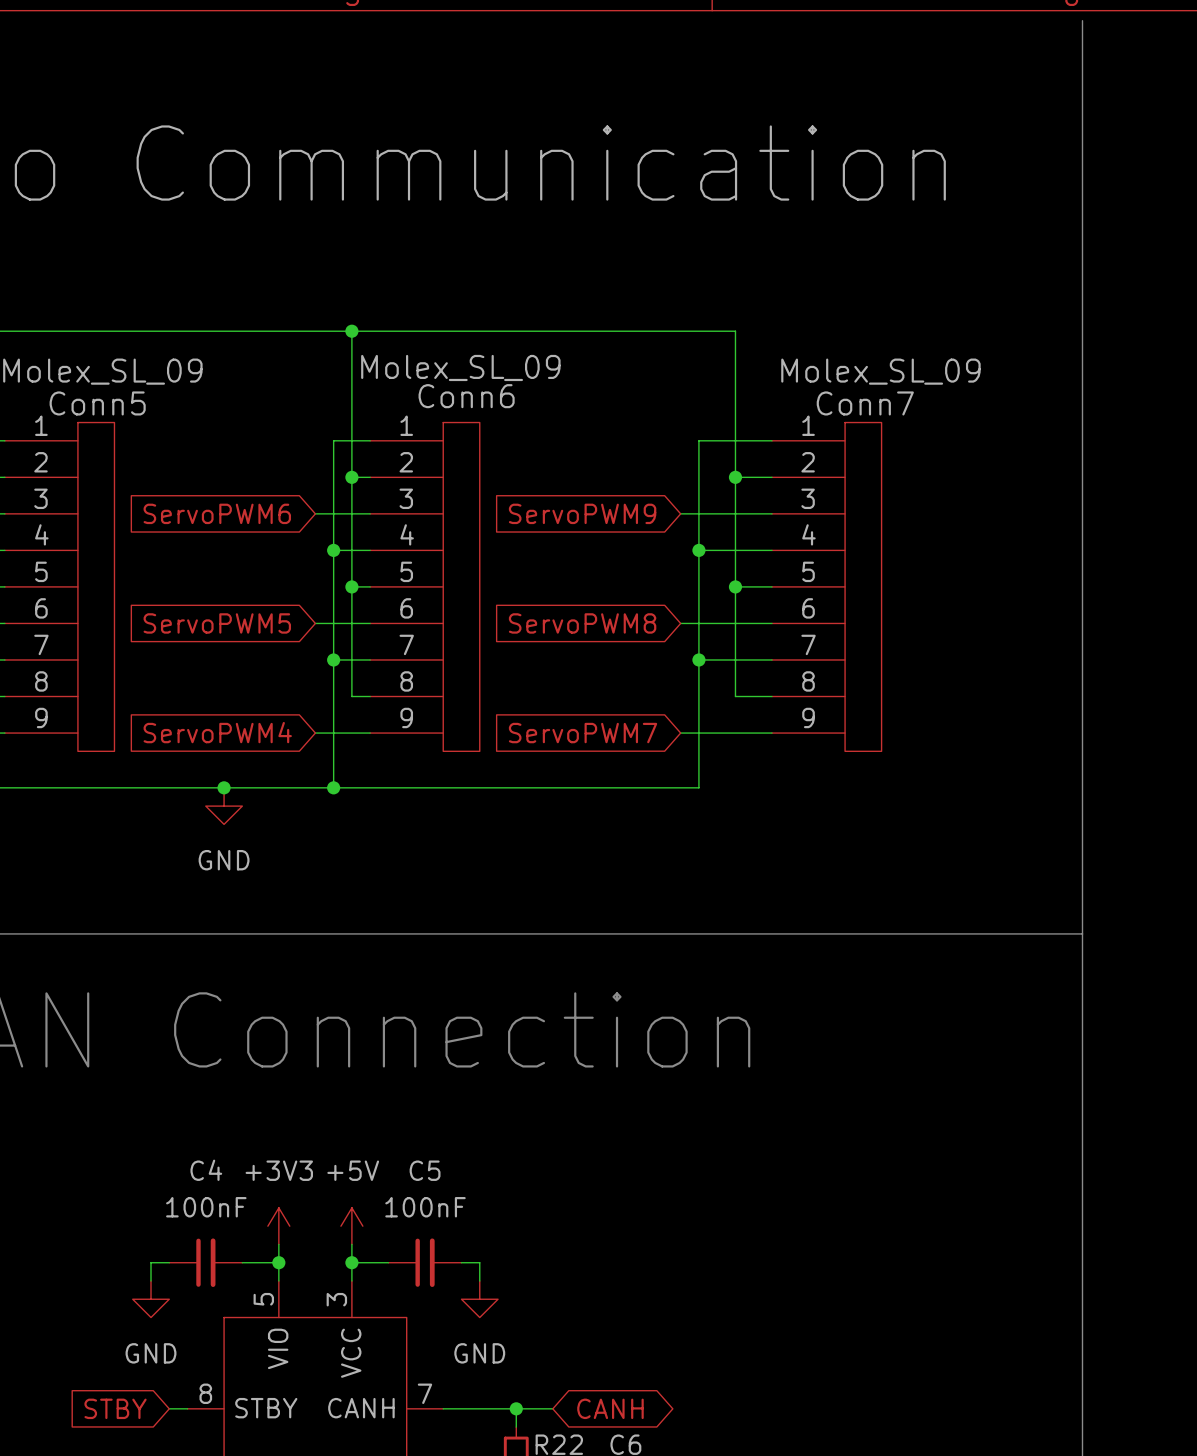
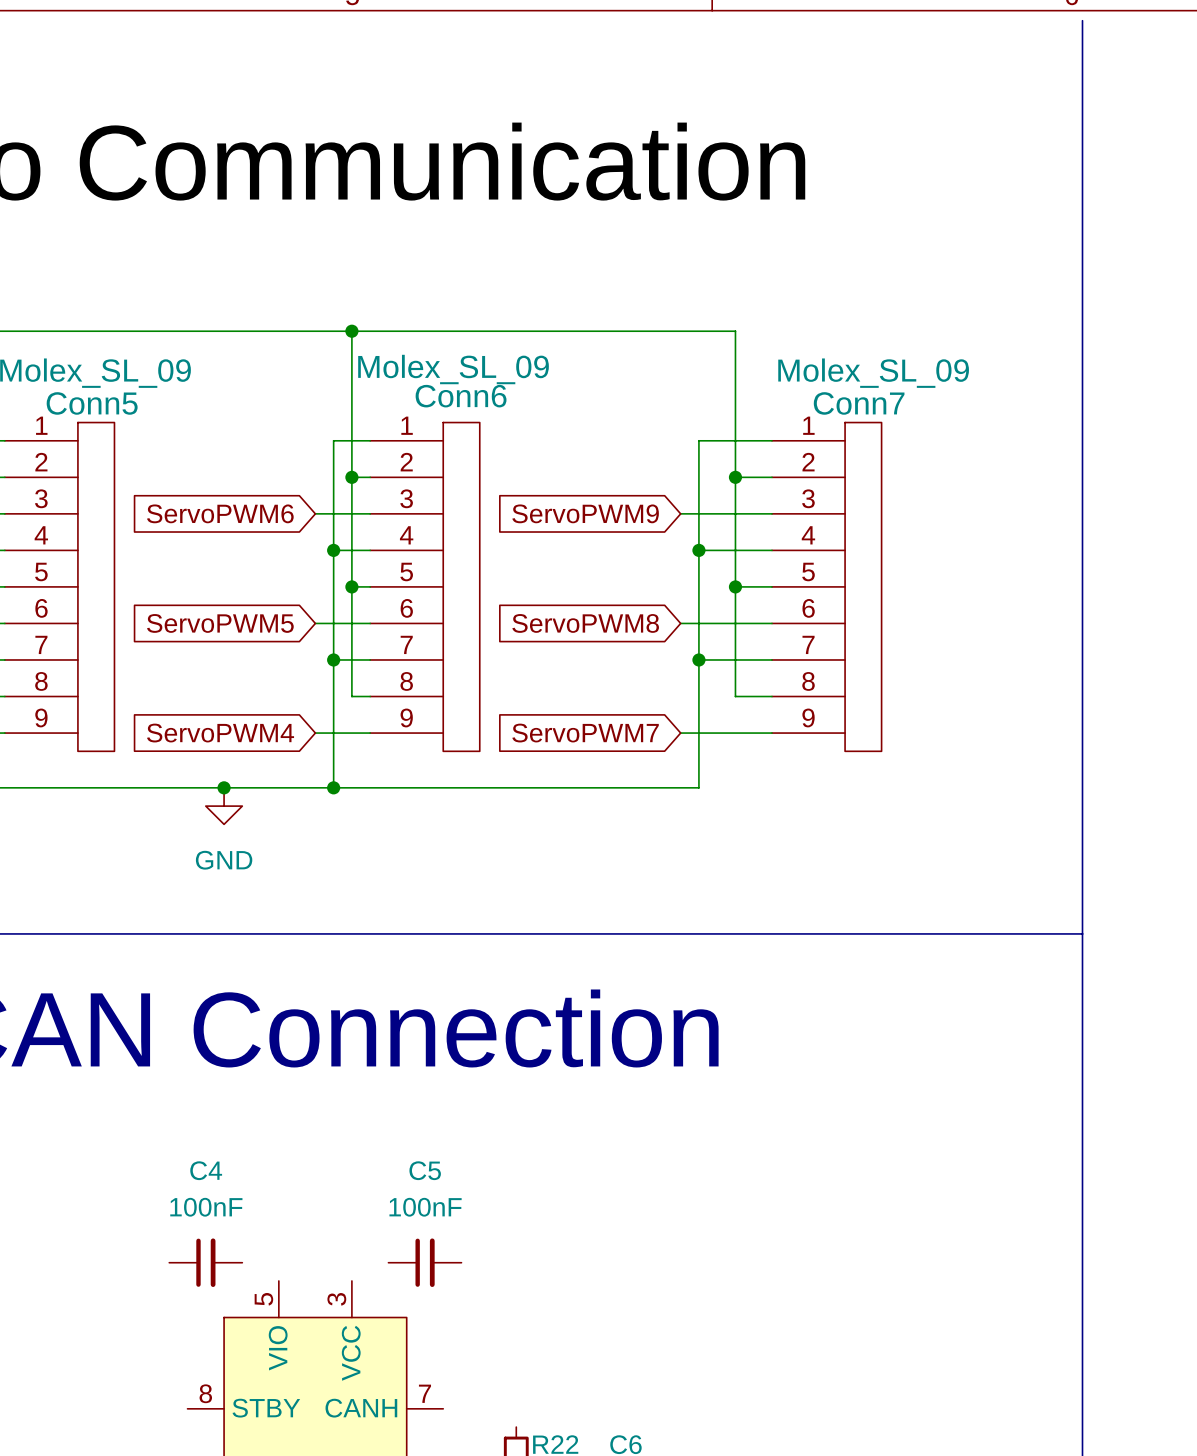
power symbol: +3V3 (278, 1226) -> none
power symbol: +5V (351, 1226) -> none
wire: (278, 1244) (278, 1280) -> none
wire: (351, 1244) (351, 1280) -> none
wire: (169, 1262) (151, 1262) (151, 1280) -> none
wire: (242, 1262) (278, 1262) -> none
junction: (278, 1262) -> none
wire: (351, 1262) (388, 1262) -> none
junction: (351, 1262) -> none
wire: (461, 1262) (479, 1262) (479, 1280) -> none
power symbol: GND (151, 1299) -> none
power symbol: GND (479, 1299) -> none
global label: STBY (115, 1408) -> none
wire: (169, 1408) (187, 1408) -> none
wire: (443, 1408) (552, 1408) -> none
wire: (516, 1408) (516, 1427) -> none
junction: (516, 1408) -> none
global label: CANH (610, 1408) -> none

